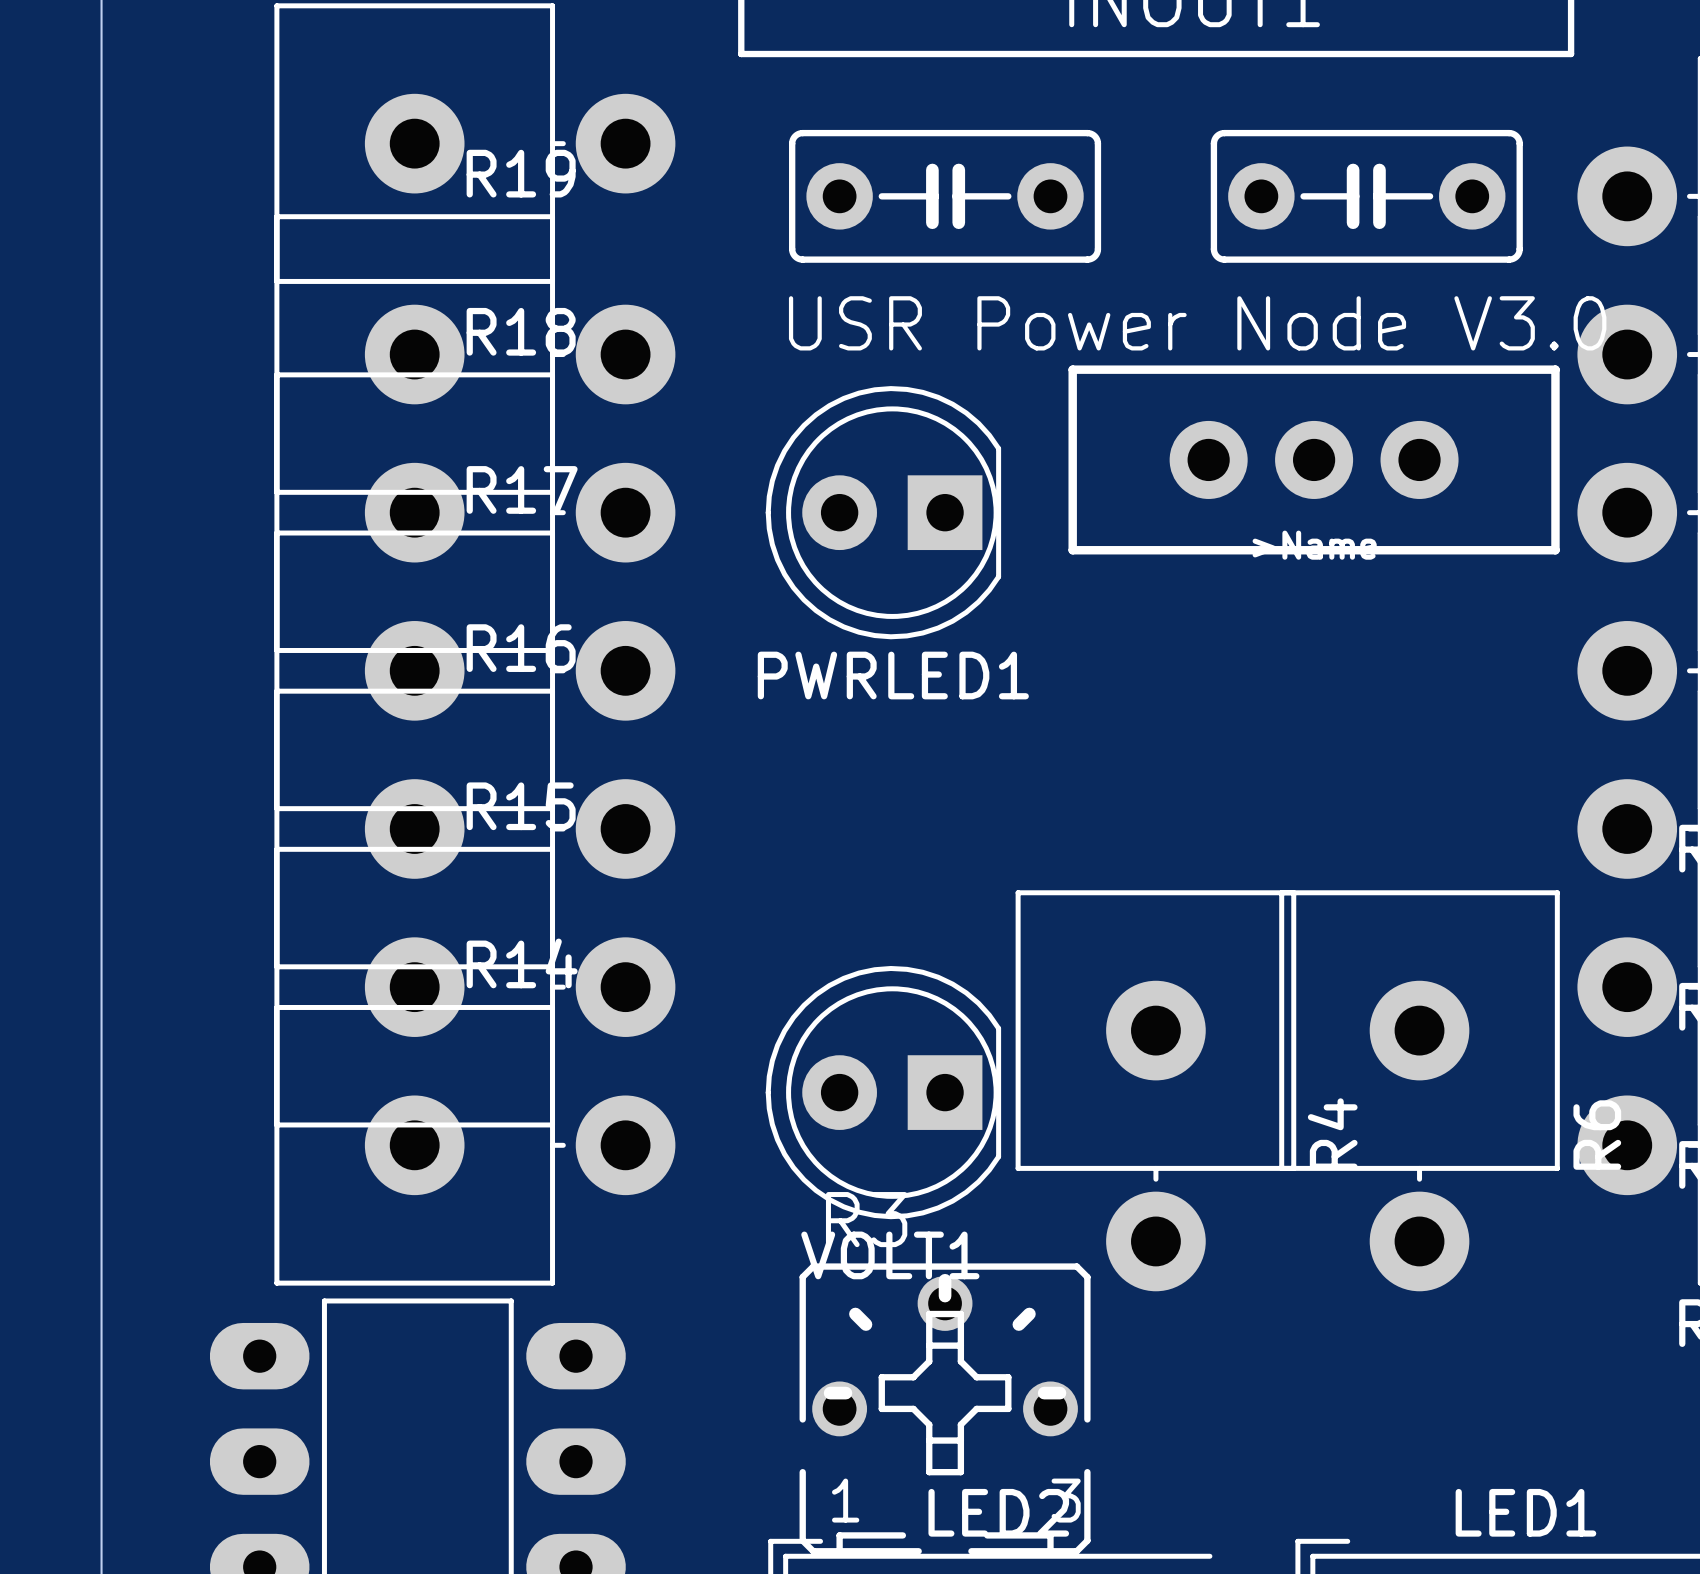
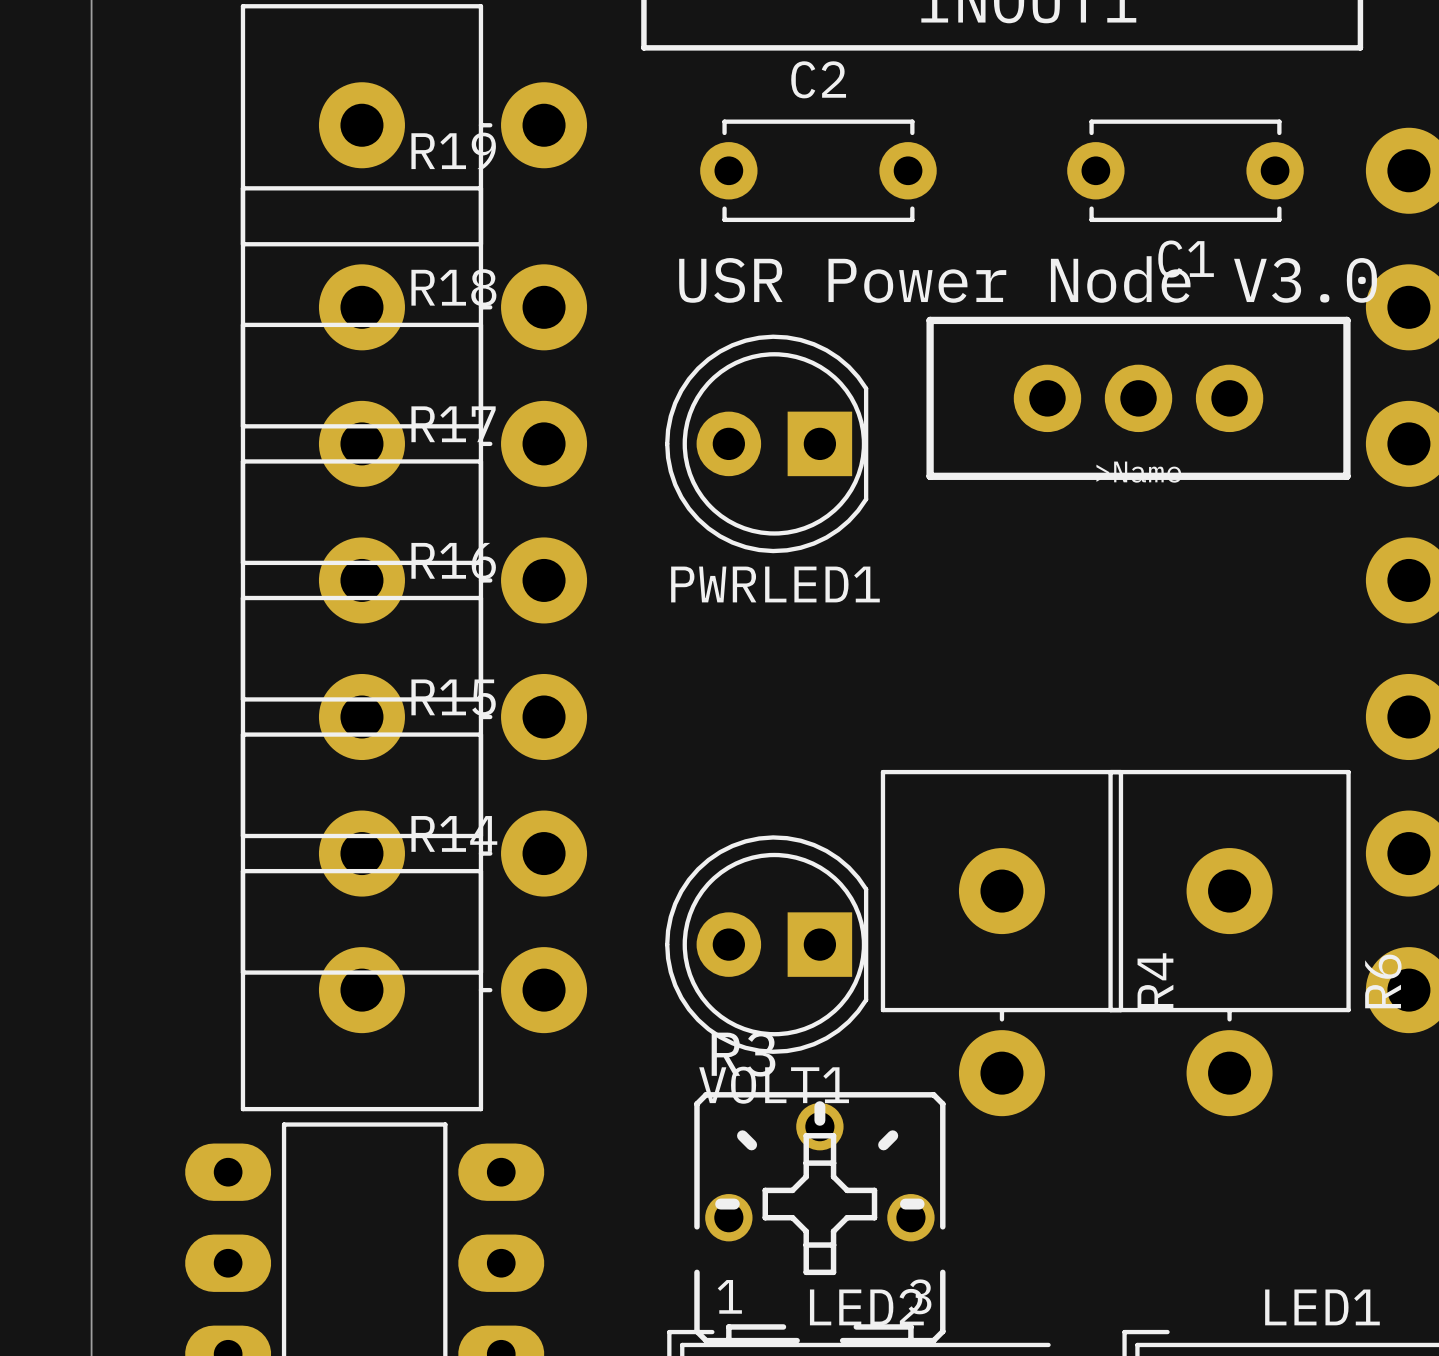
C2: none -> (818, 170)
part: (945, 196) -> none
part: (1366, 196) -> none
C1: none -> (1185, 170)

